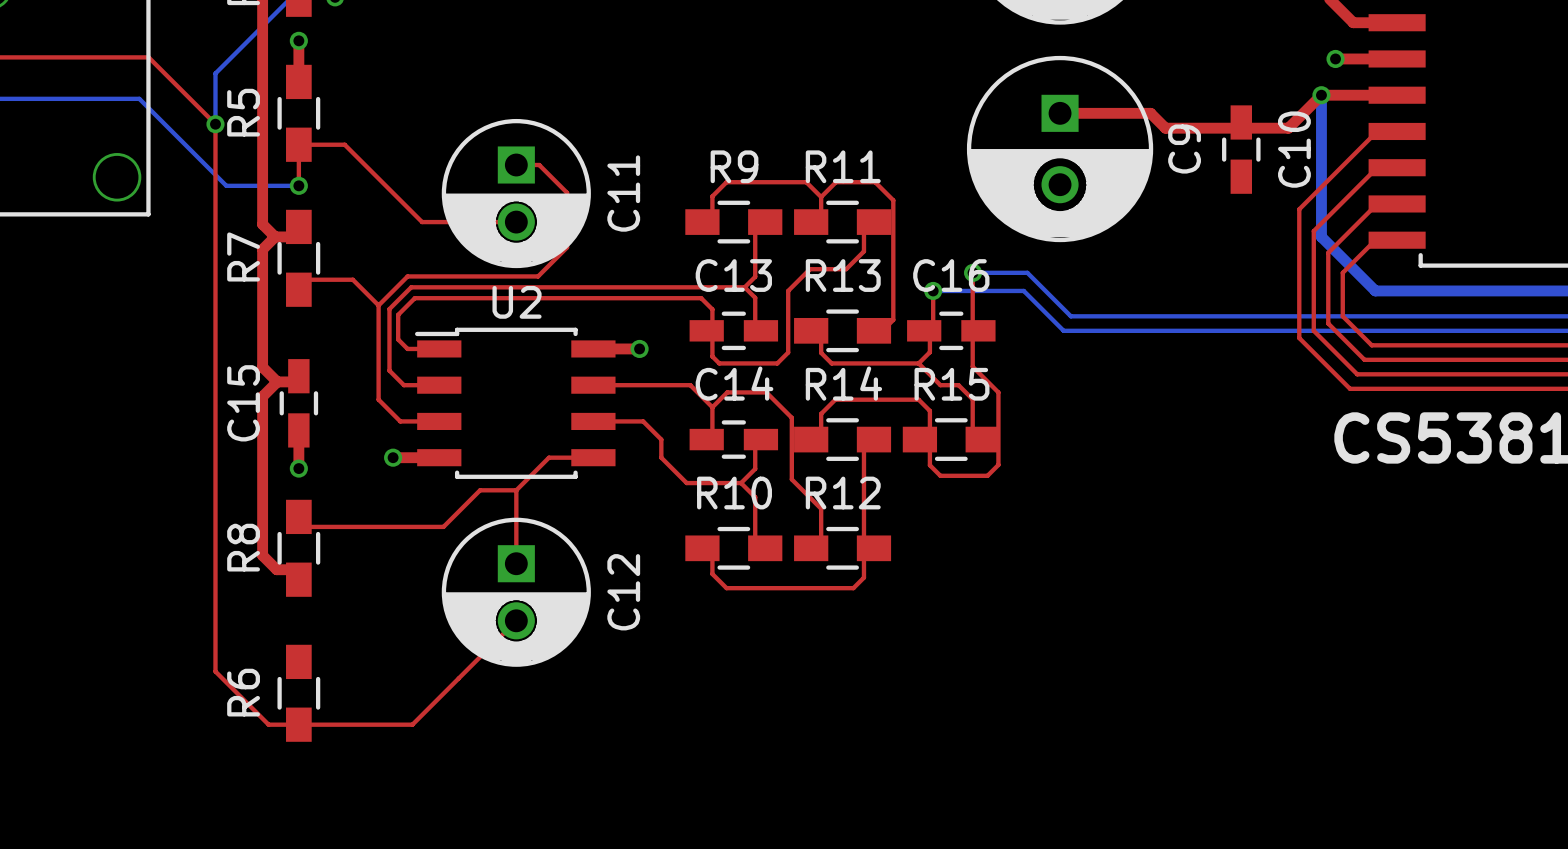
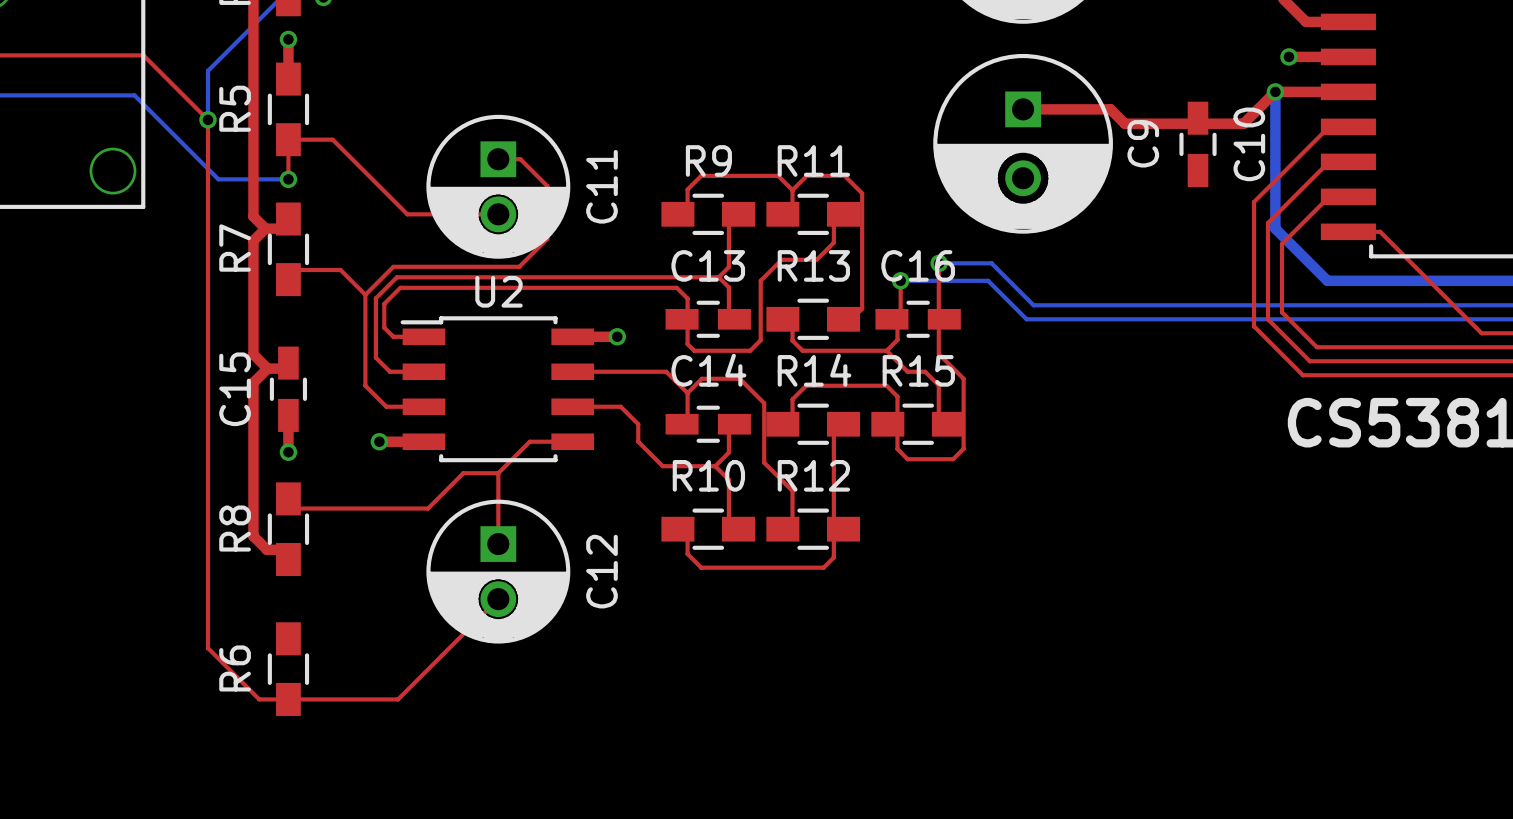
top track: (1397, 240) (1375, 240) (1342, 272) (1342, 316) (1371, 345) (1535, 345) -> (1348, 231) (1380, 231) (1481, 333)

